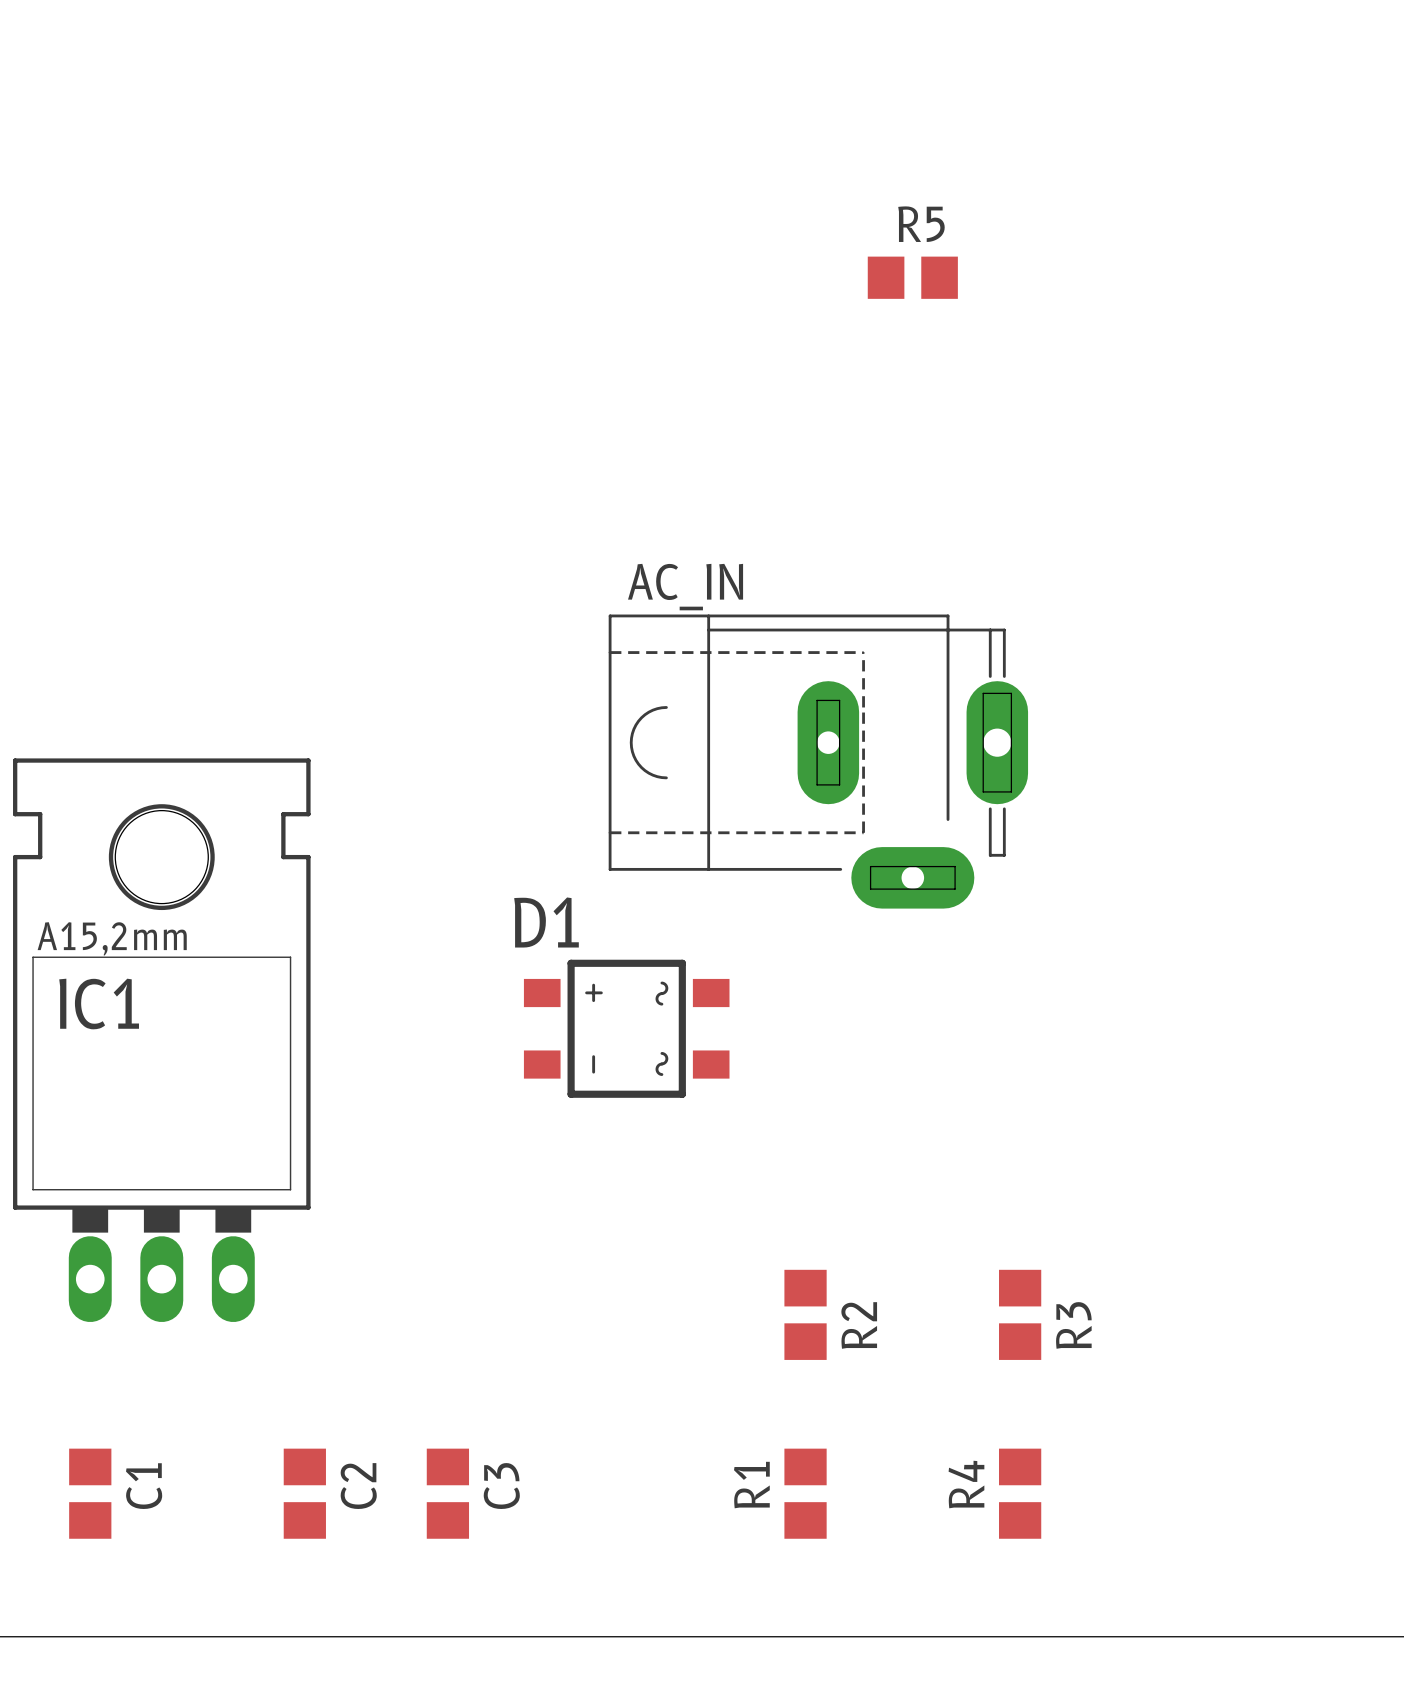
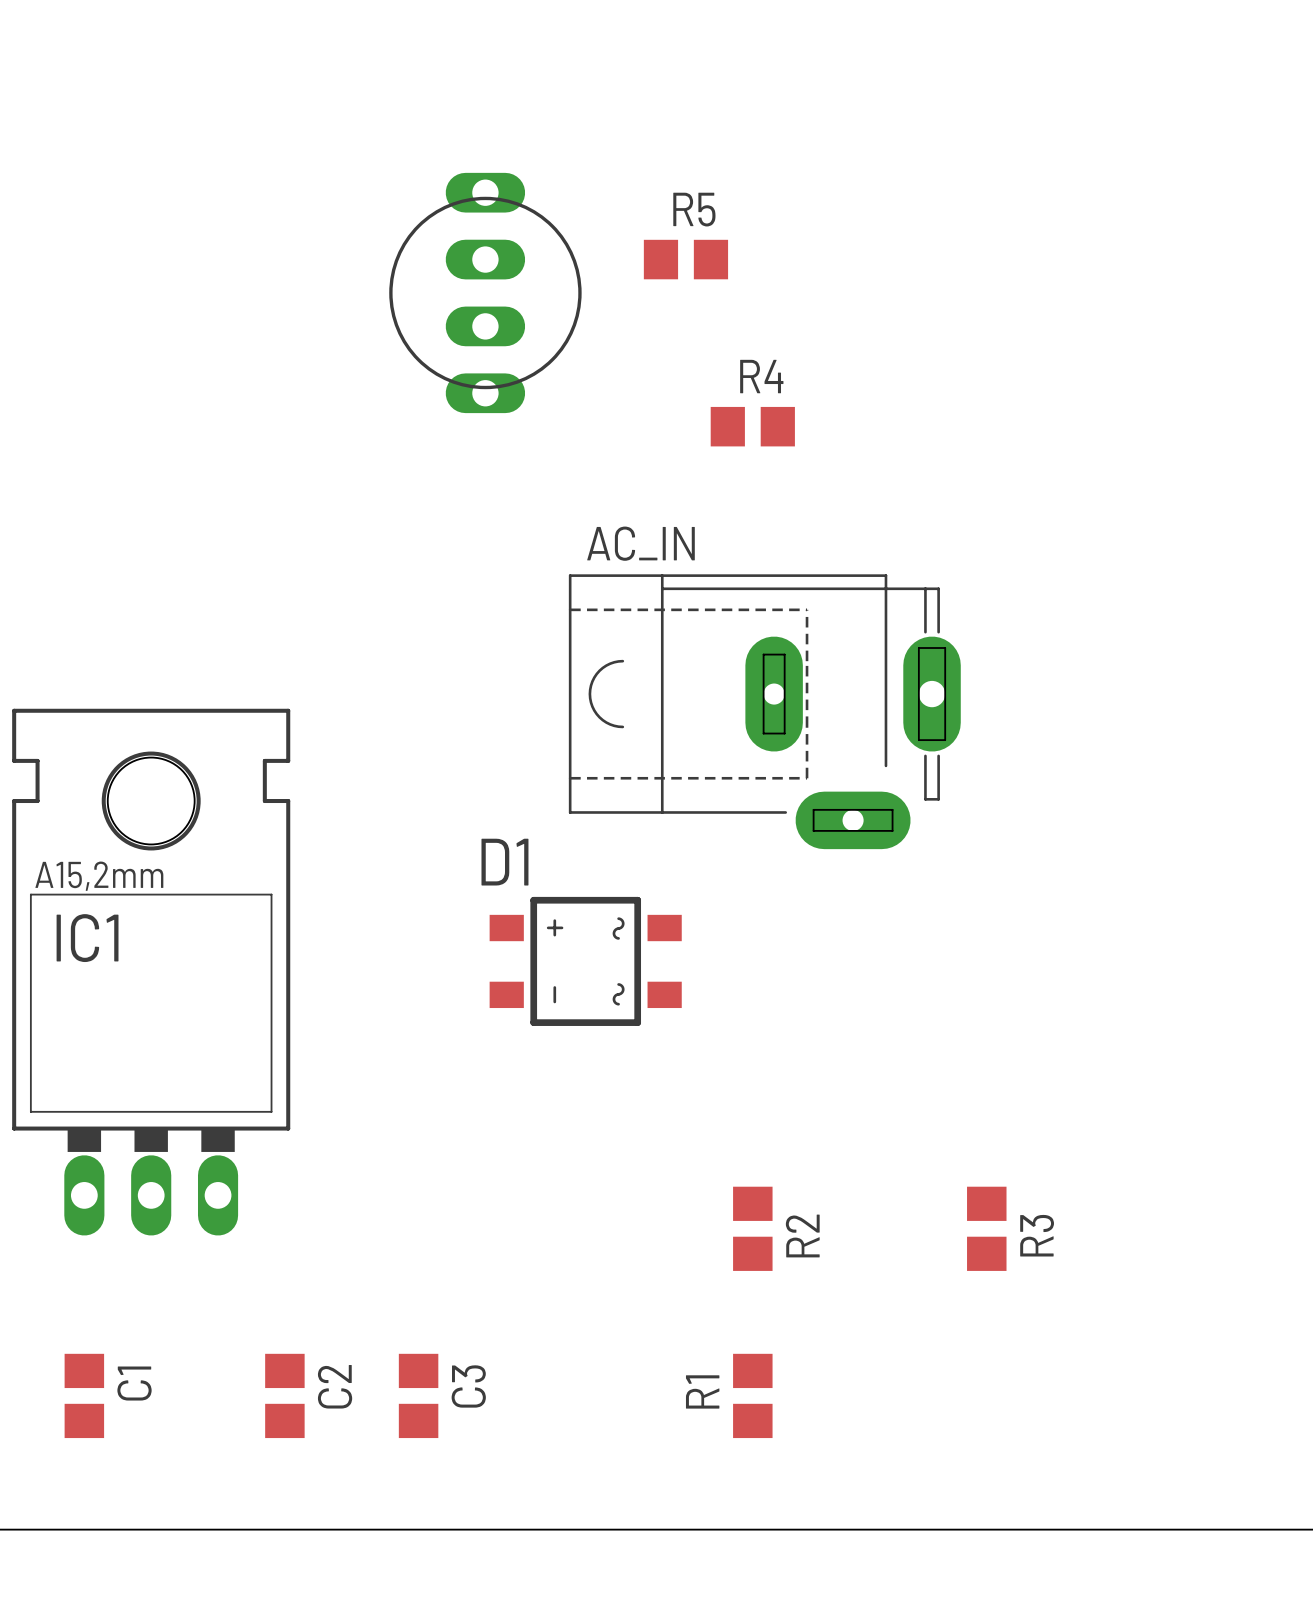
R5 position: (912, 277) -> (685, 259)
part: none -> (485, 292)
R3 position: (1020, 1314) -> (986, 1228)
R4 rotation: 0° (1020, 1493) -> 90° clockwise (752, 426)
R4 position: (1020, 1493) -> (752, 426)

